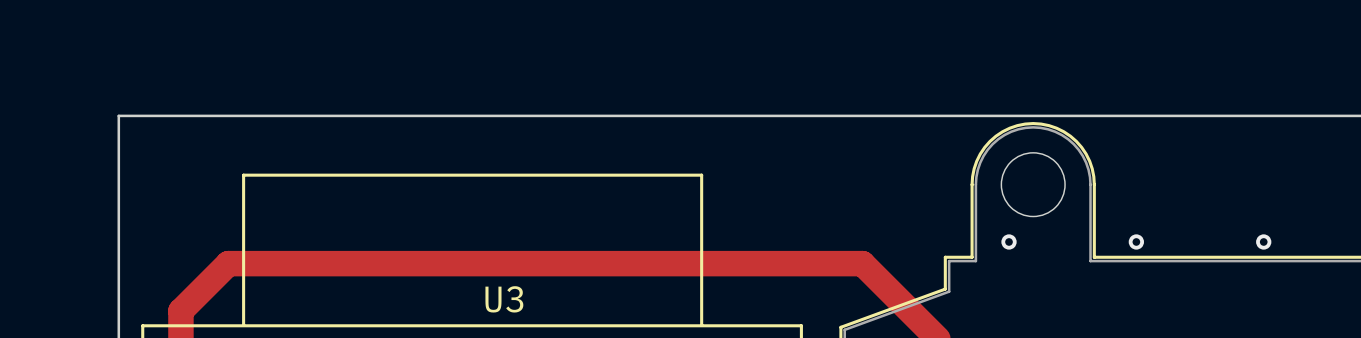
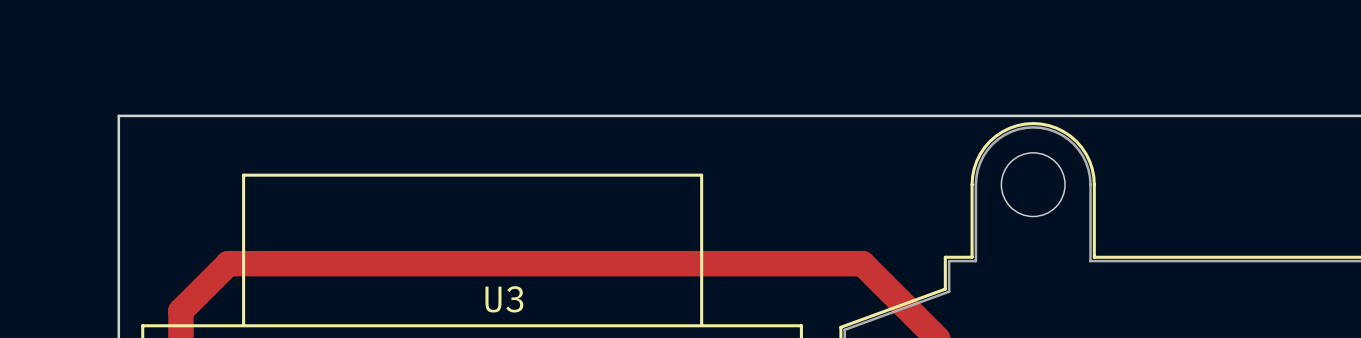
via: (1009, 241) -> none
via: (1136, 241) -> none
via: (1263, 241) -> none

